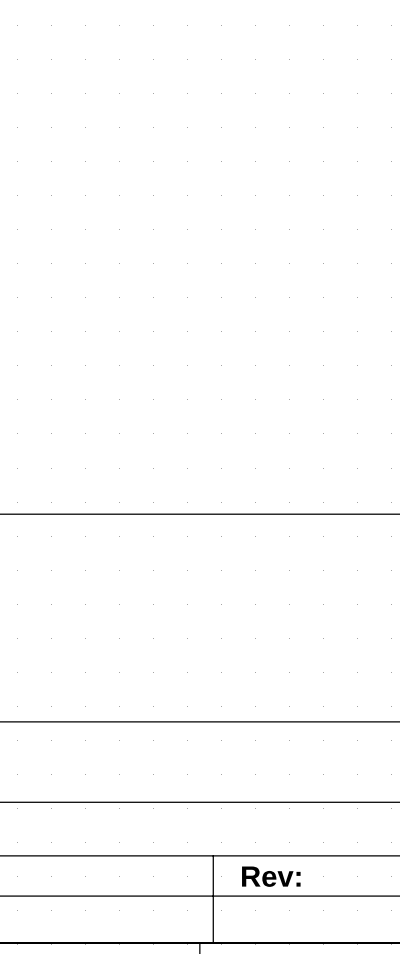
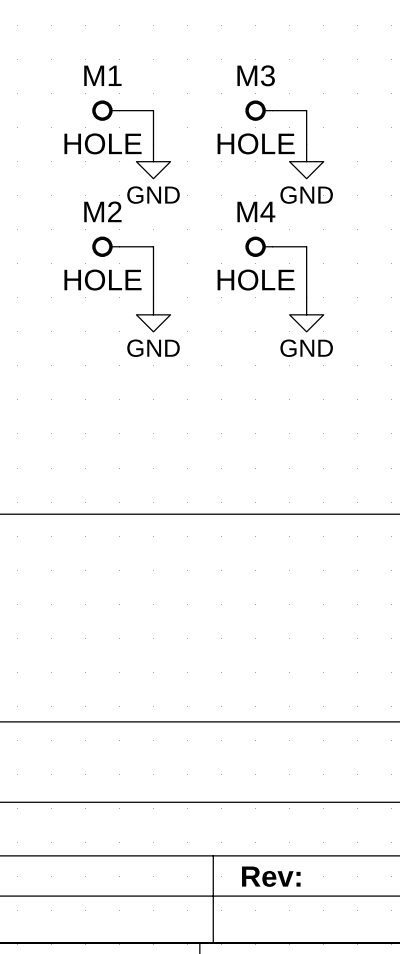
M1: none -> HOLE (105, 110)
wire: none -> (119, 110) (153, 110) (153, 144)
M3: none -> HOLE (259, 110)
wire: none -> (272, 110) (306, 110) (306, 144)
power symbol: none -> GND (153, 161)
power symbol: none -> GND (306, 161)
M2: none -> HOLE (105, 246)
wire: none -> (119, 246) (153, 246) (153, 297)
M4: none -> HOLE (259, 246)
wire: none -> (272, 246) (306, 246) (306, 297)
power symbol: none -> GND (153, 314)
power symbol: none -> GND (306, 314)

